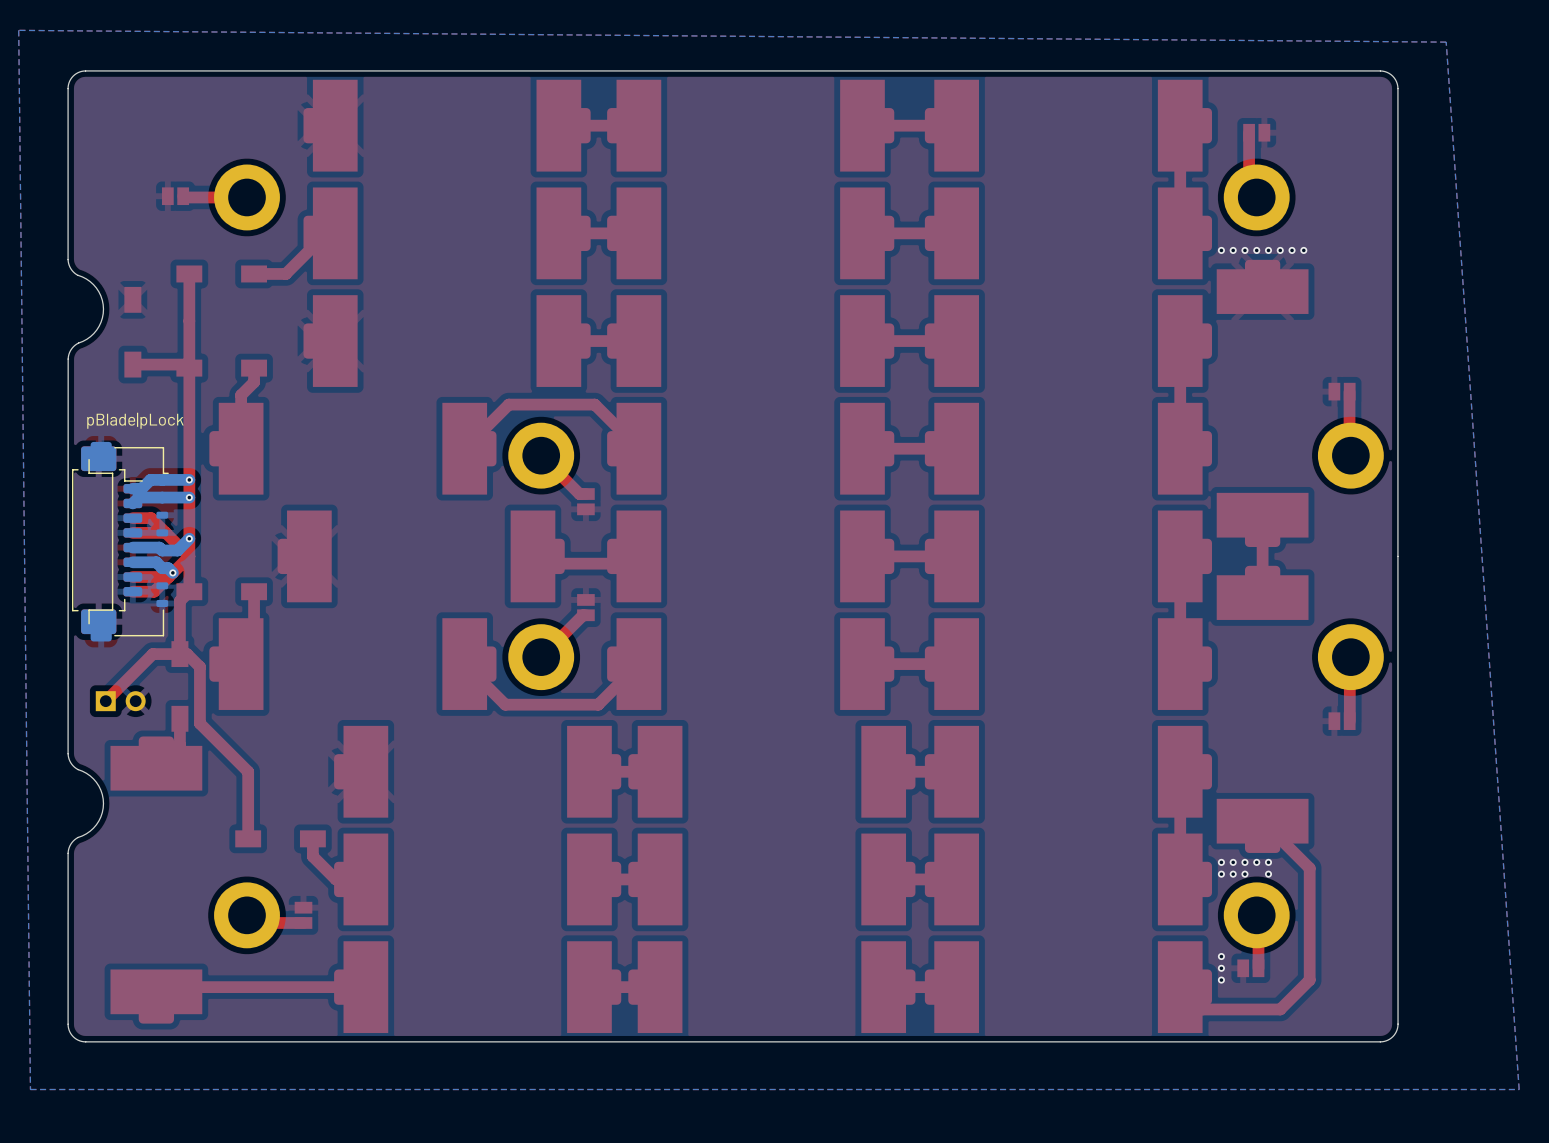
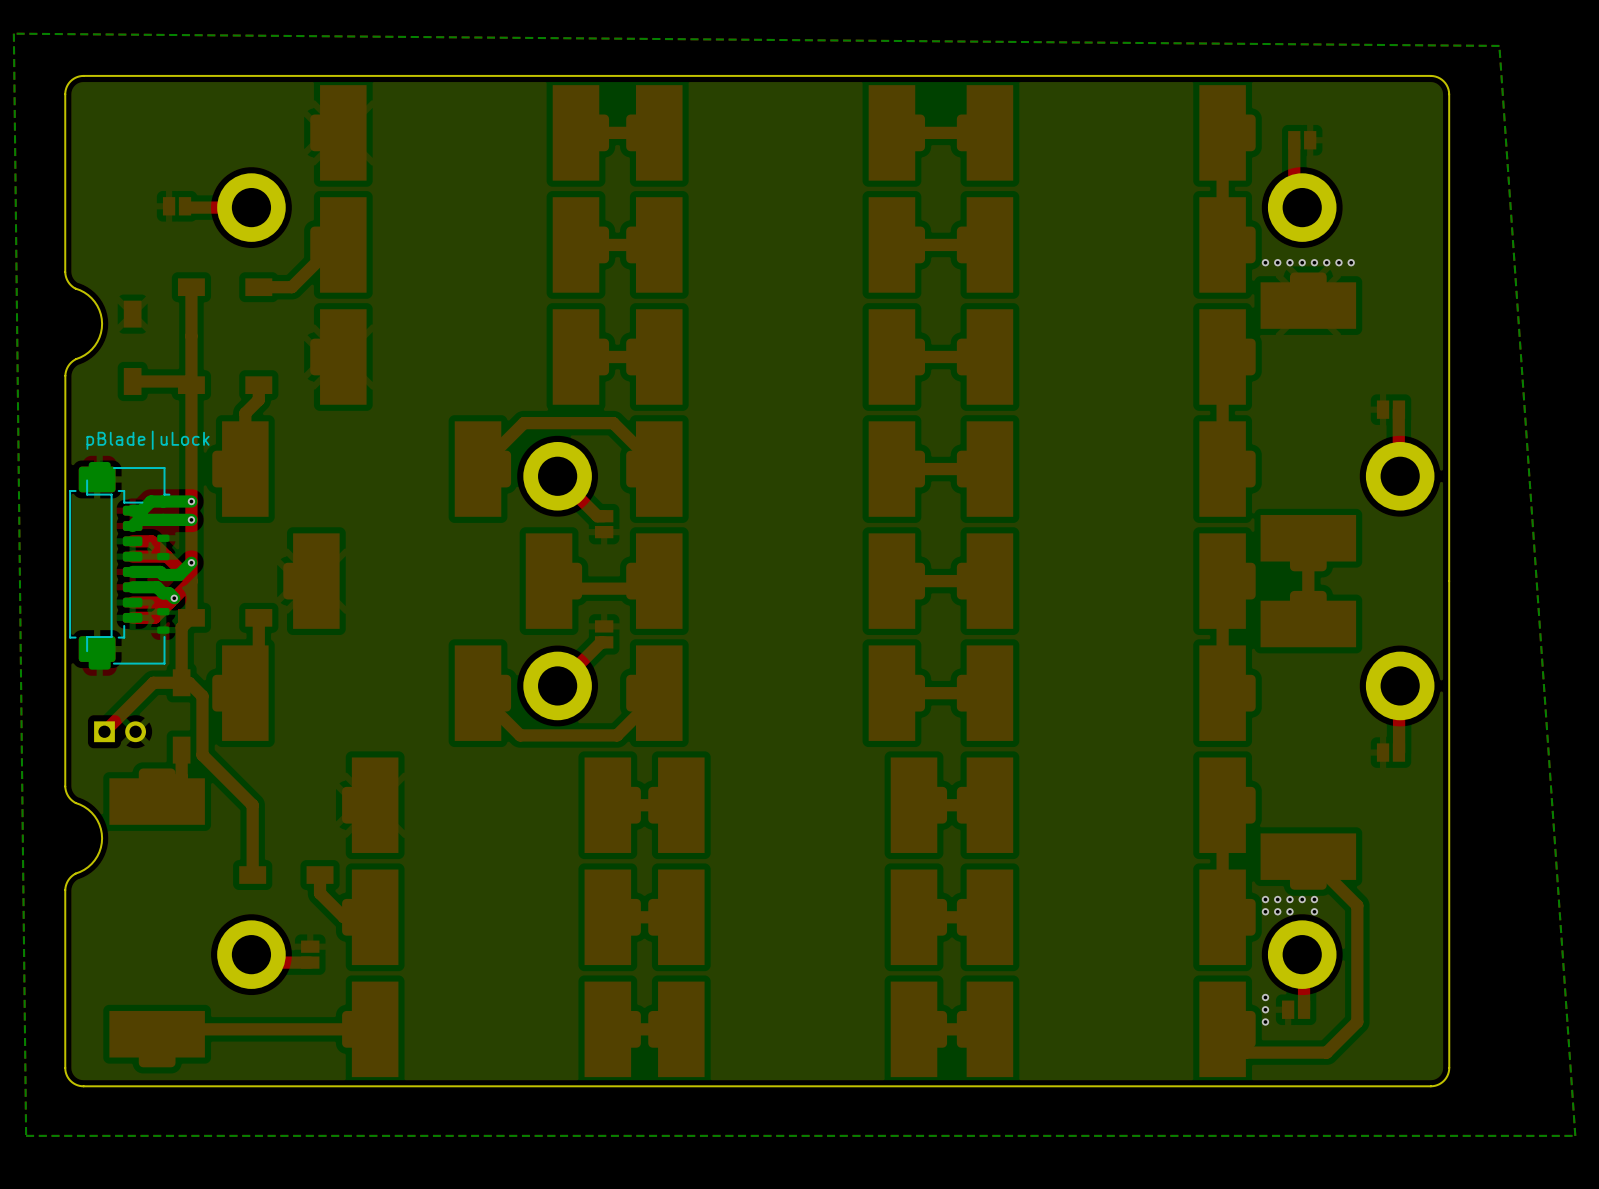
text: pBlade|pLock (135, 420) -> pBlade|uLock (148, 440)

